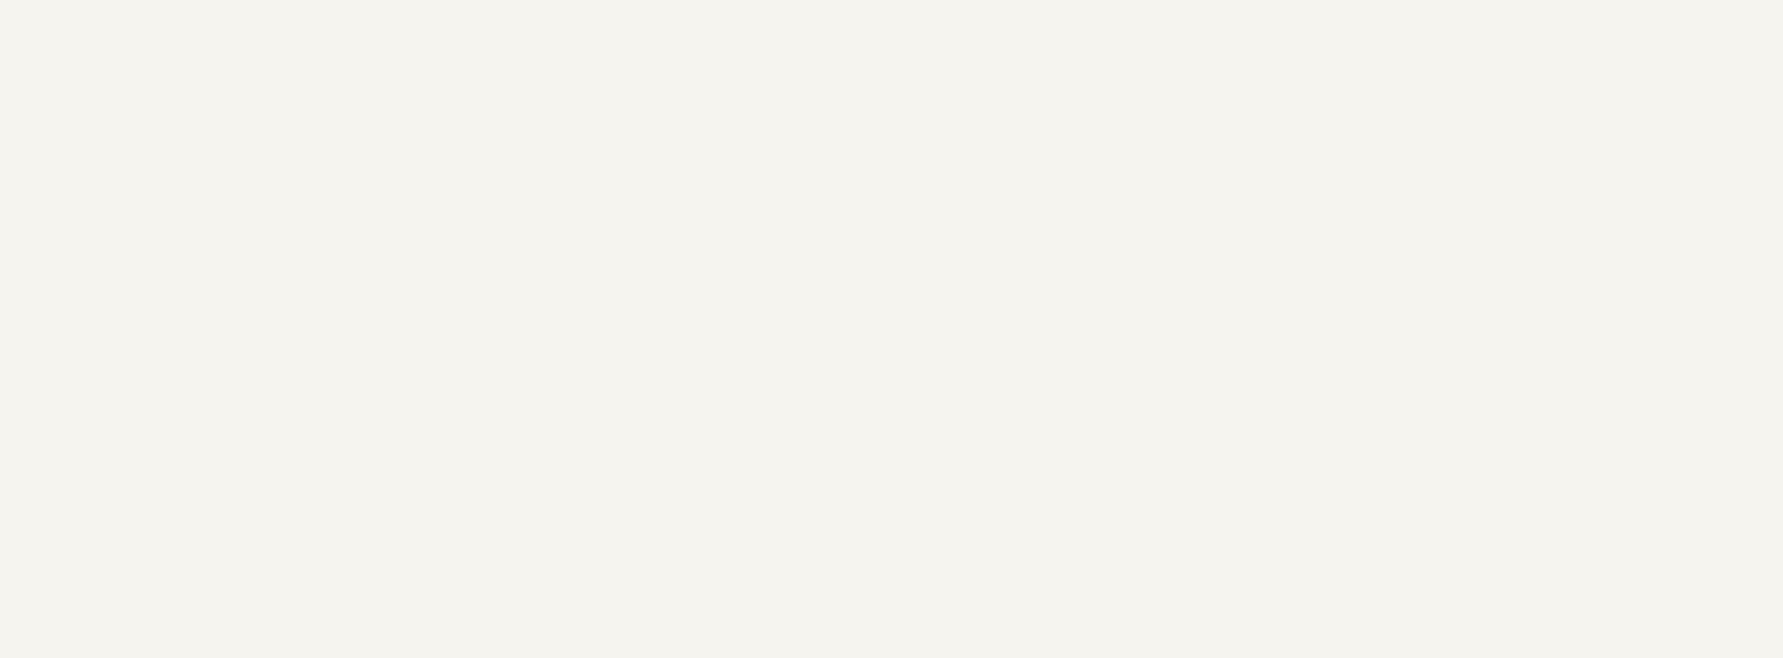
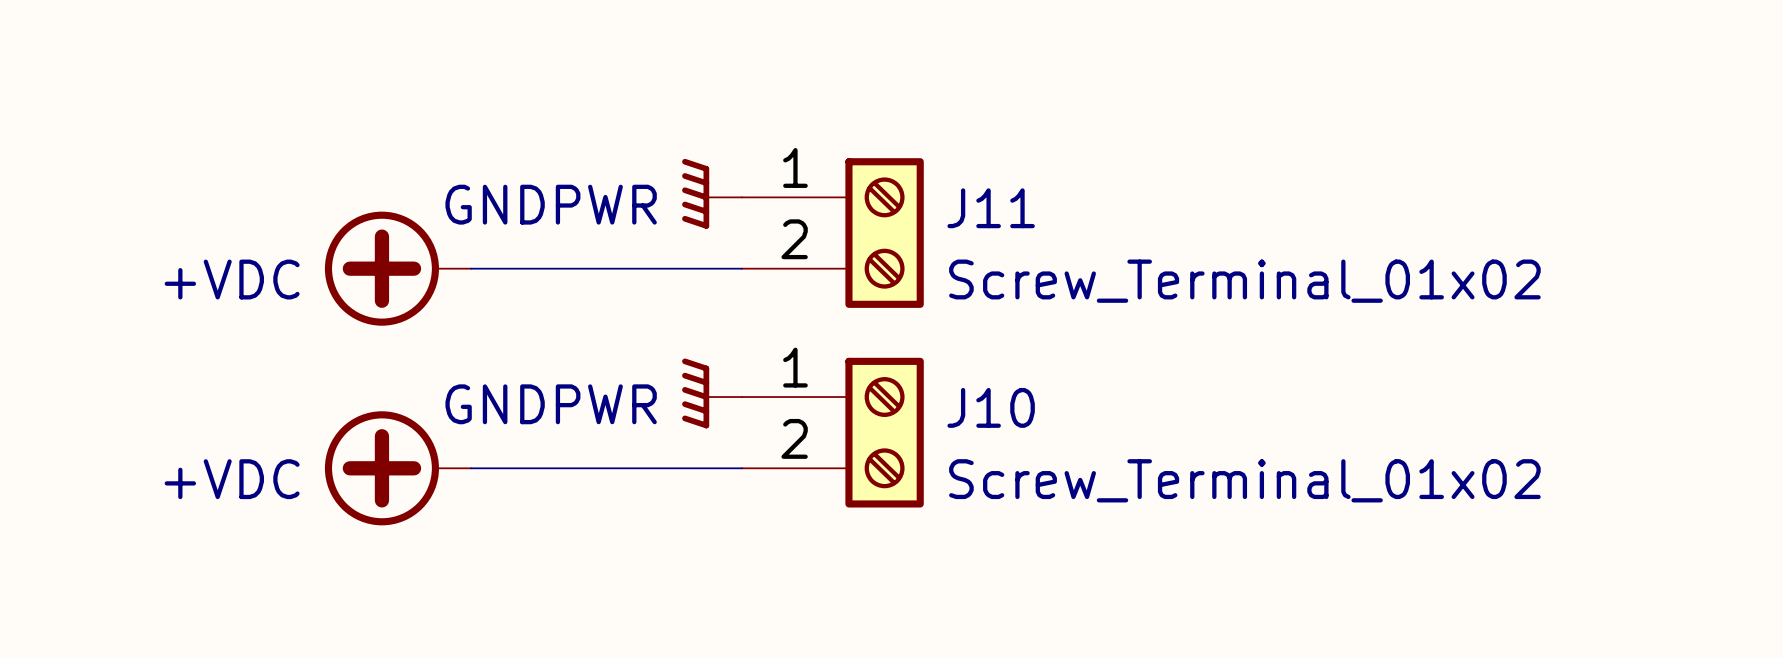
power symbol: none -> GNDPWR (712, 193)
J11: none -> Screw_Terminal_01x02 (832, 233)
power symbol: none -> +VDC (397, 268)
wire: none -> (471, 268) (742, 268)
power symbol: none -> GNDPWR (712, 393)
J10: none -> Screw_Terminal_01x02 (832, 432)
power symbol: none -> +VDC (397, 468)
wire: none -> (471, 468) (742, 468)

